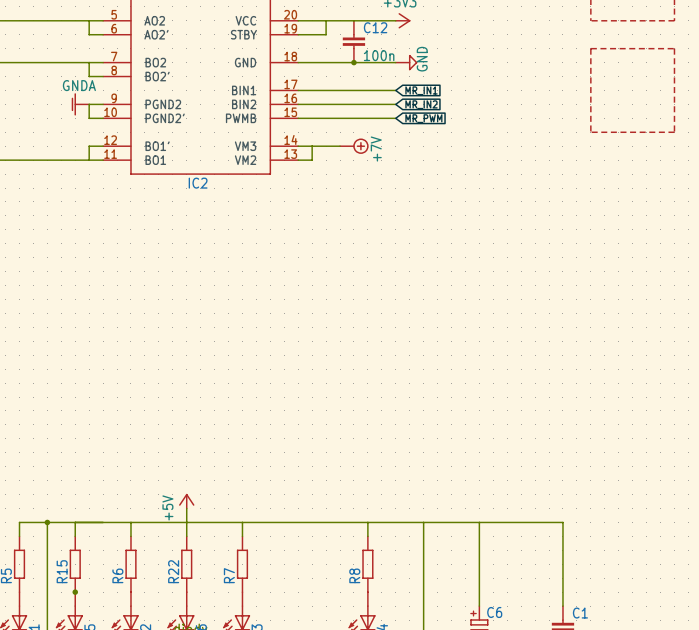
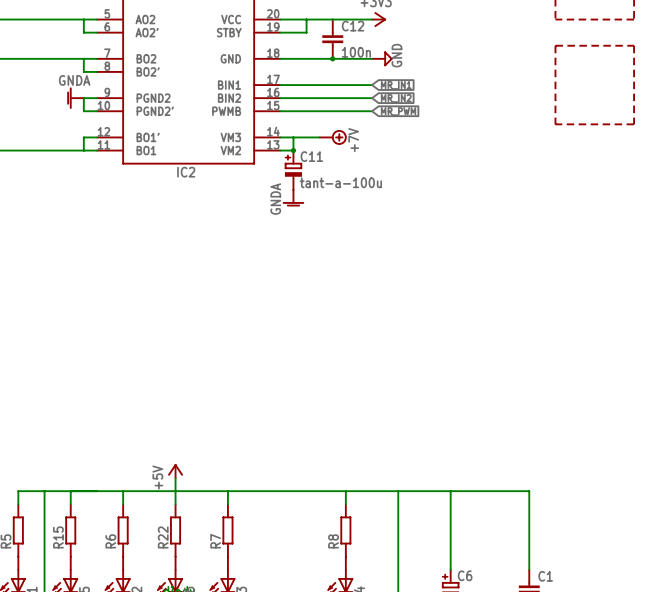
junction: none -> (293, 150)
C11: none -> tant-a-100u (293, 170)
power symbol: none -> GNDA (293, 198)
junction: (47, 522) -> none
junction: (75, 592) -> none

